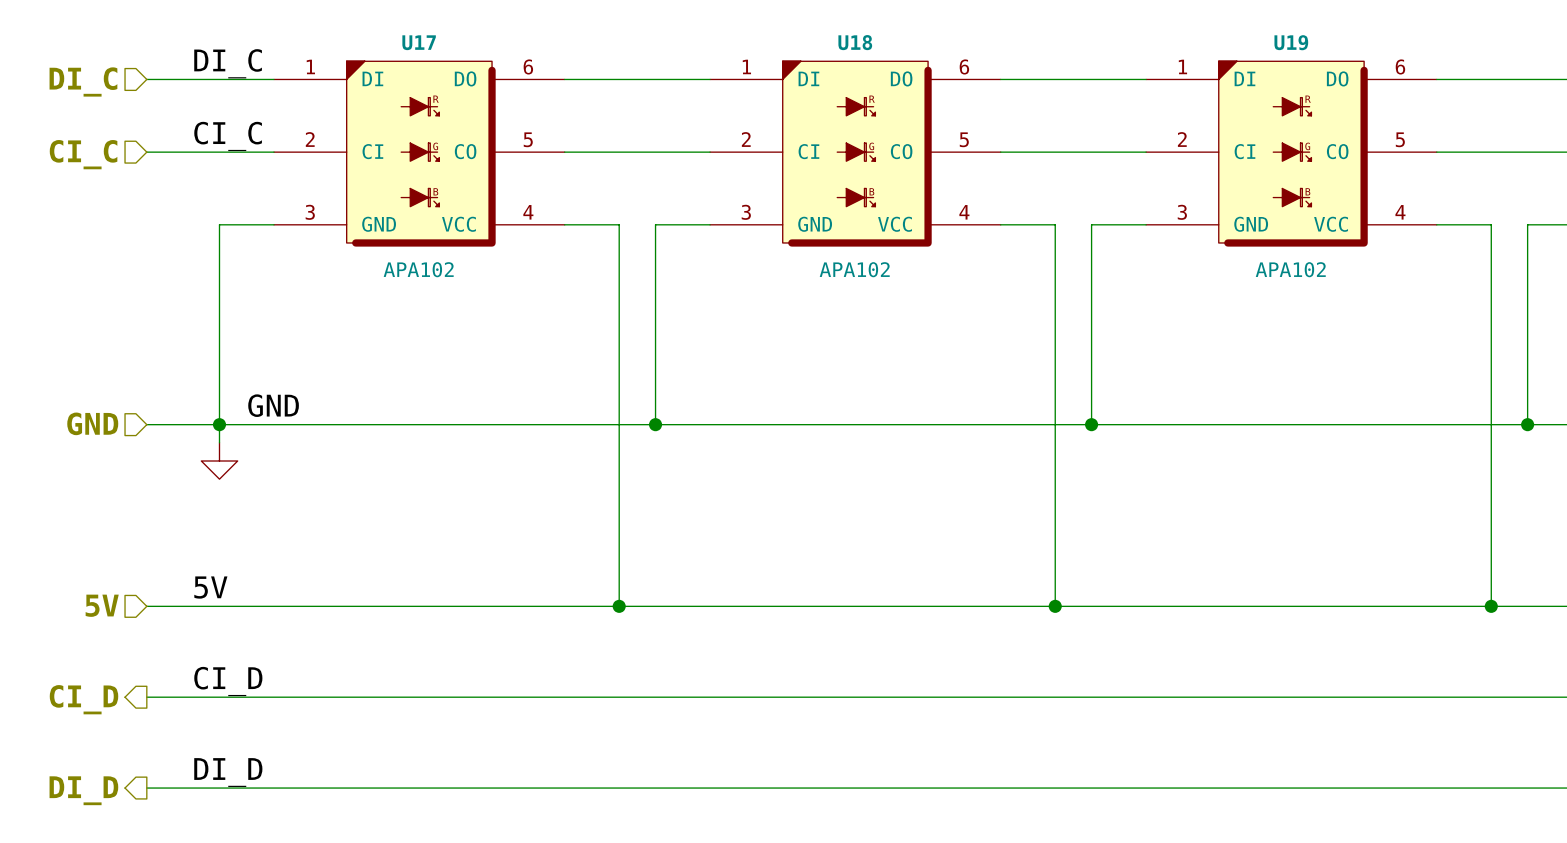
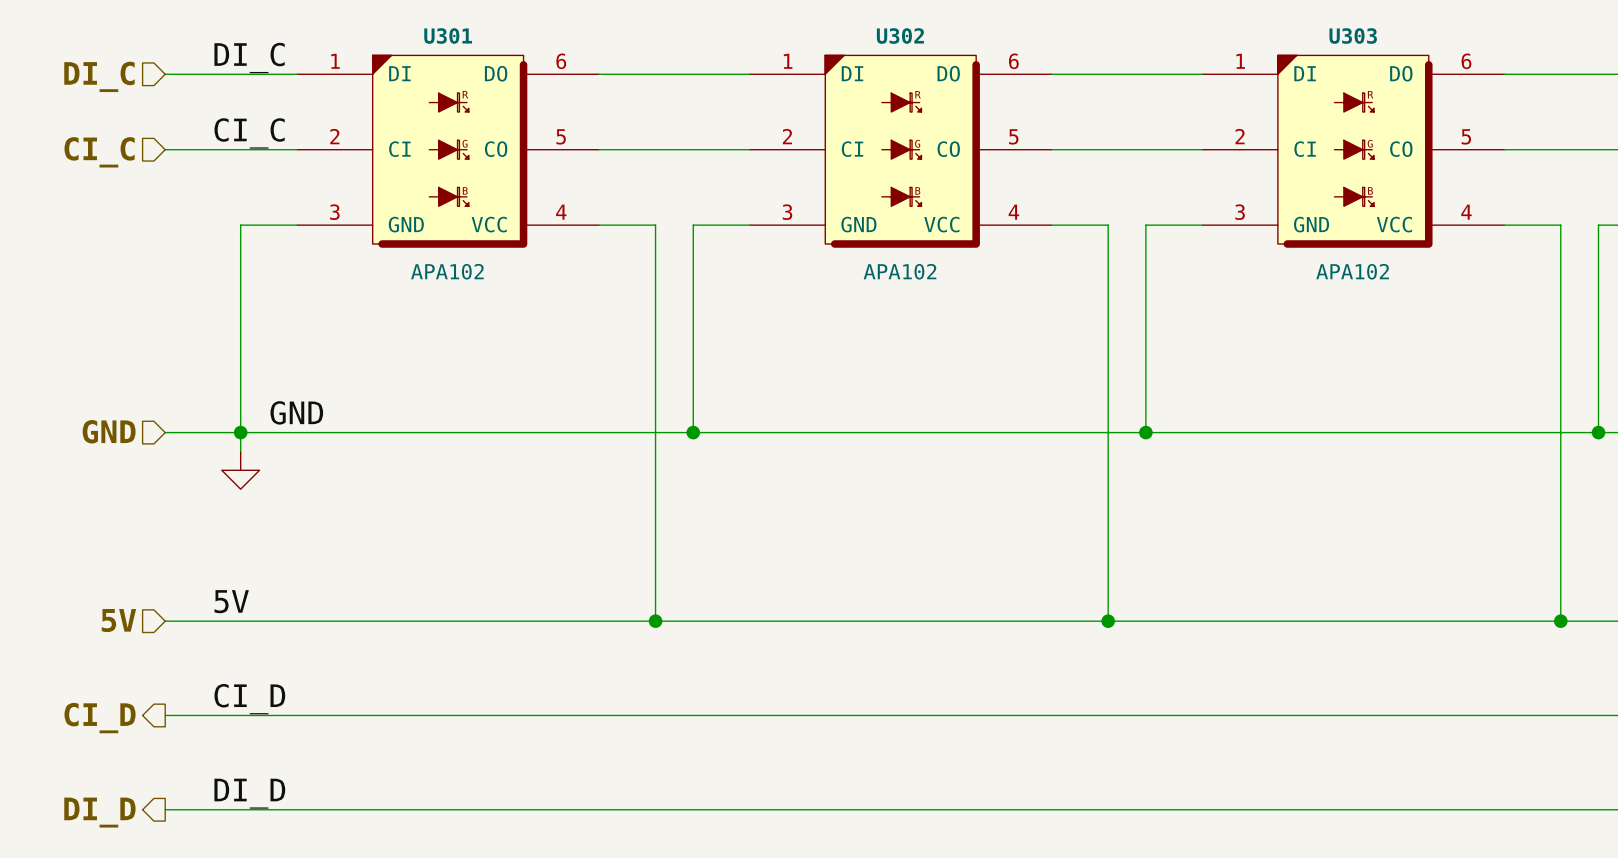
U17 name: U17 (419, 42) -> U301 (448, 36)
U18 name: U18 (855, 42) -> U302 (900, 36)
U19 name: U19 (1291, 42) -> U303 (1353, 36)

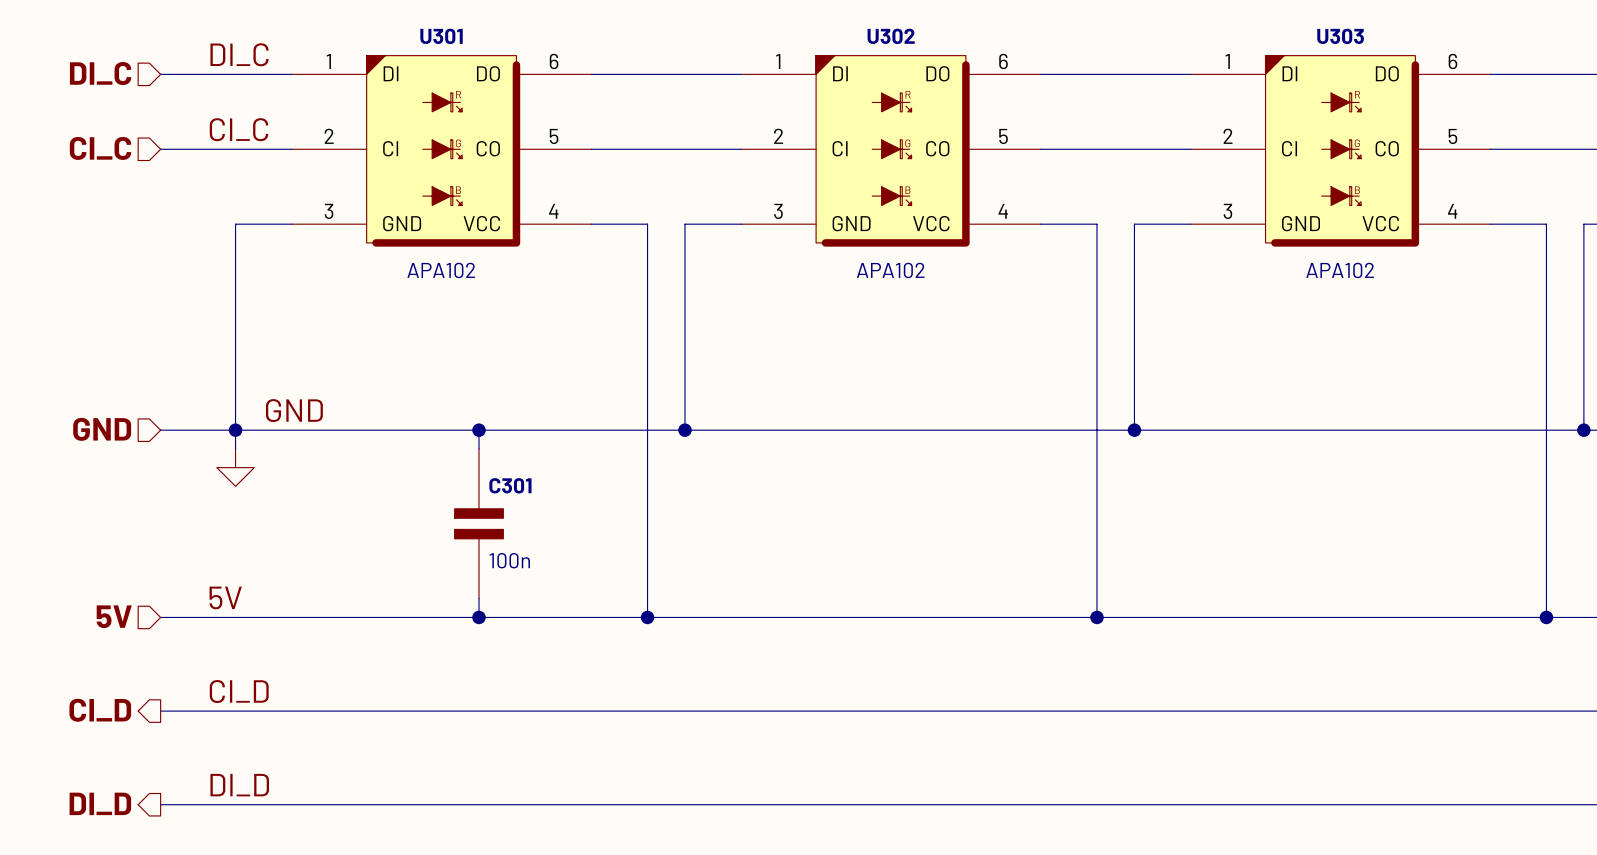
wire: none -> (479, 430) (479, 448)
junction: none -> (479, 430)
C301: none -> 100n (479, 523)
wire: none -> (479, 598) (479, 617)
junction: none -> (479, 617)

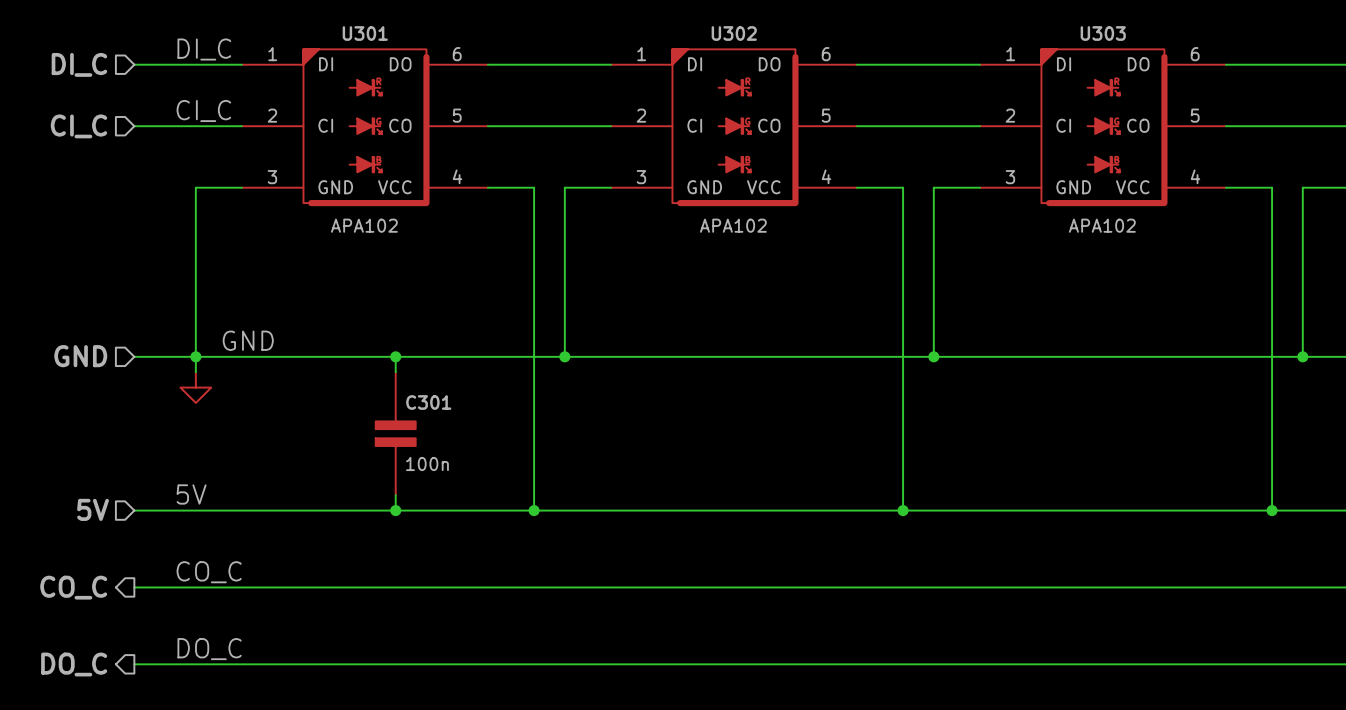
label: CI_D (239, 691) -> CO_C (209, 572)
hierarchical label: CI_D (100, 710) -> CO_C (73, 587)
label: DI_D (239, 785) -> DO_C (209, 649)
hierarchical label: DI_D (100, 803) -> DO_C (74, 664)

